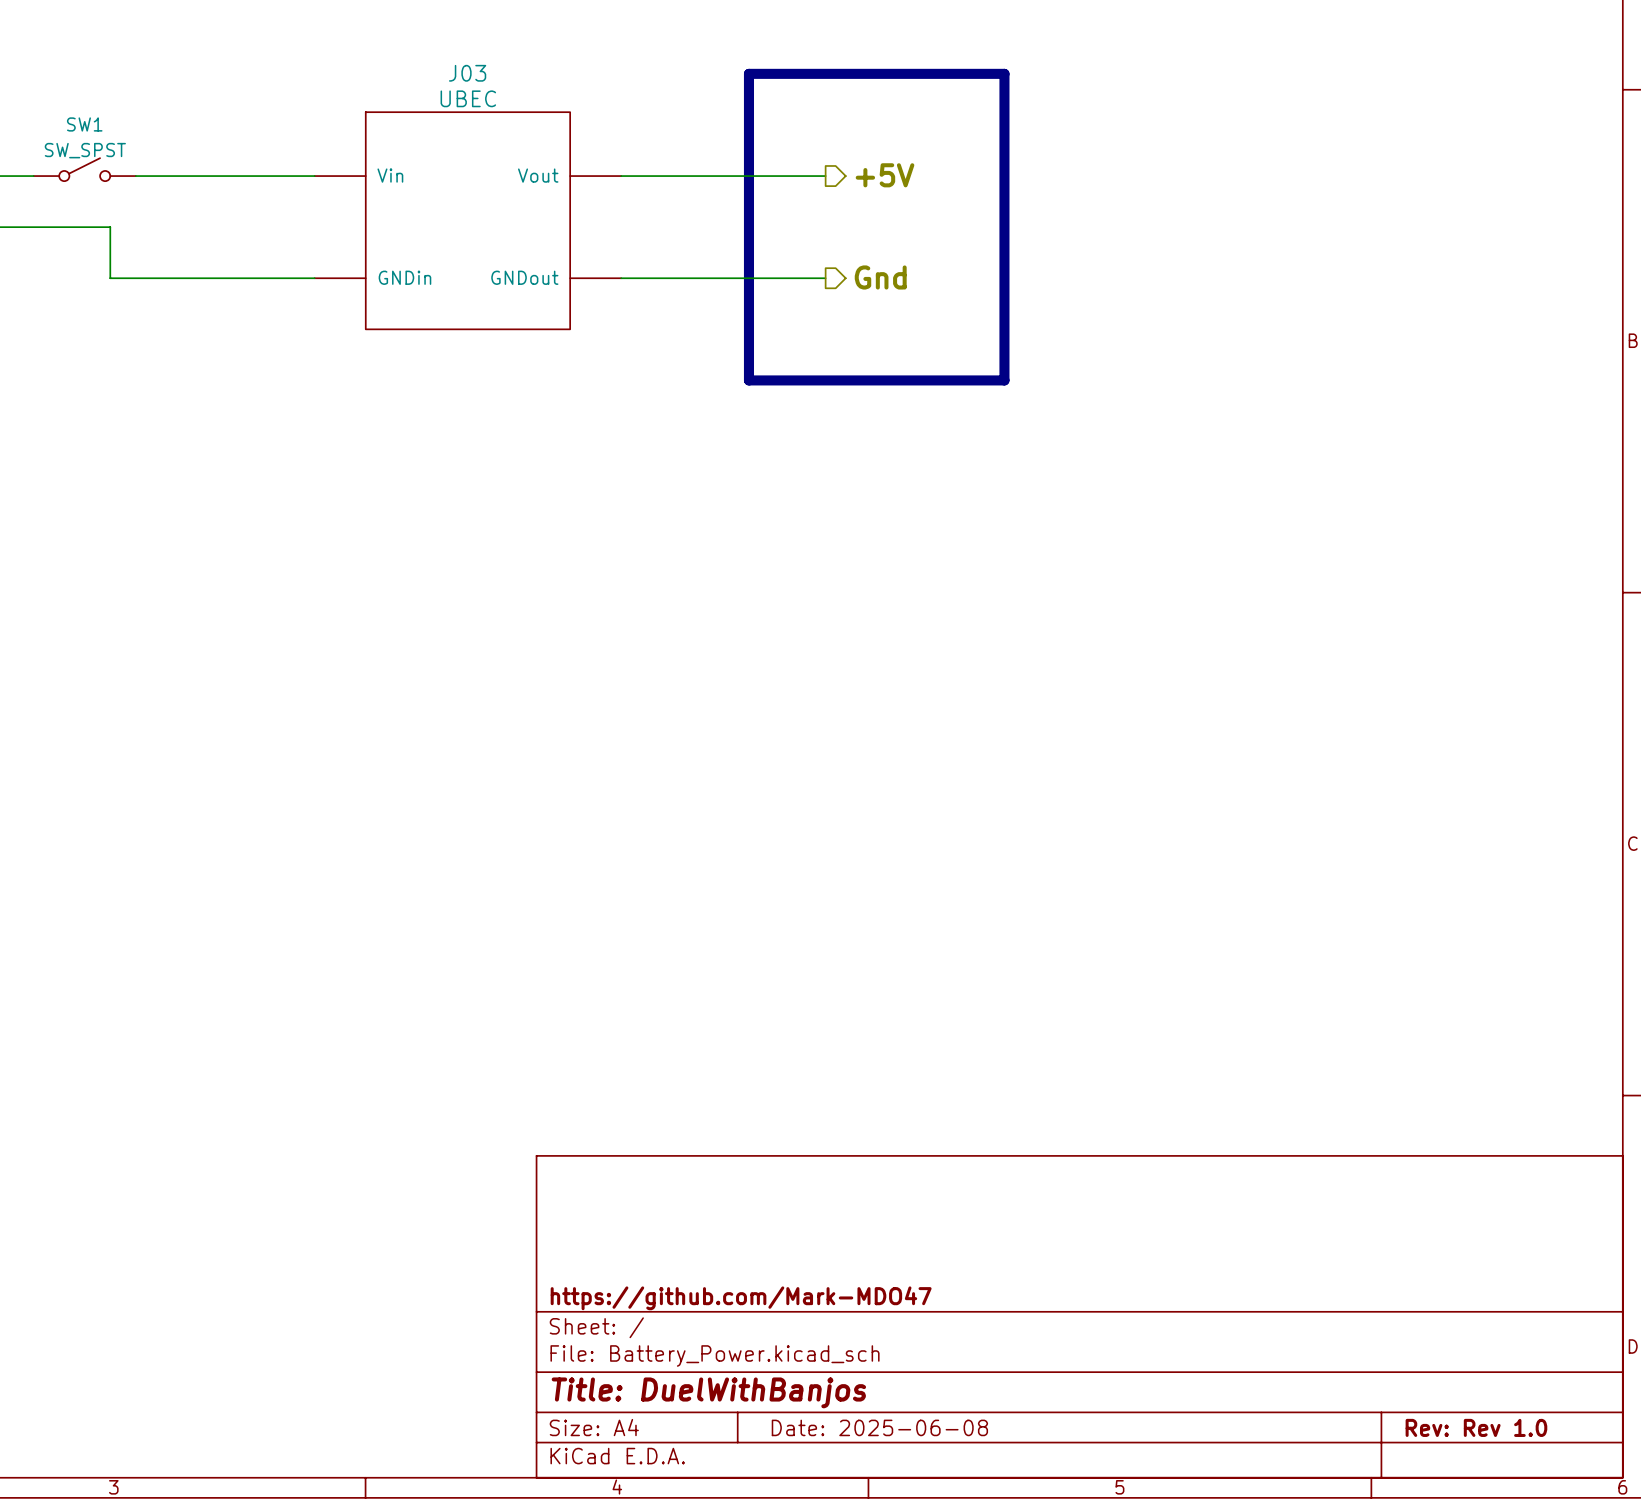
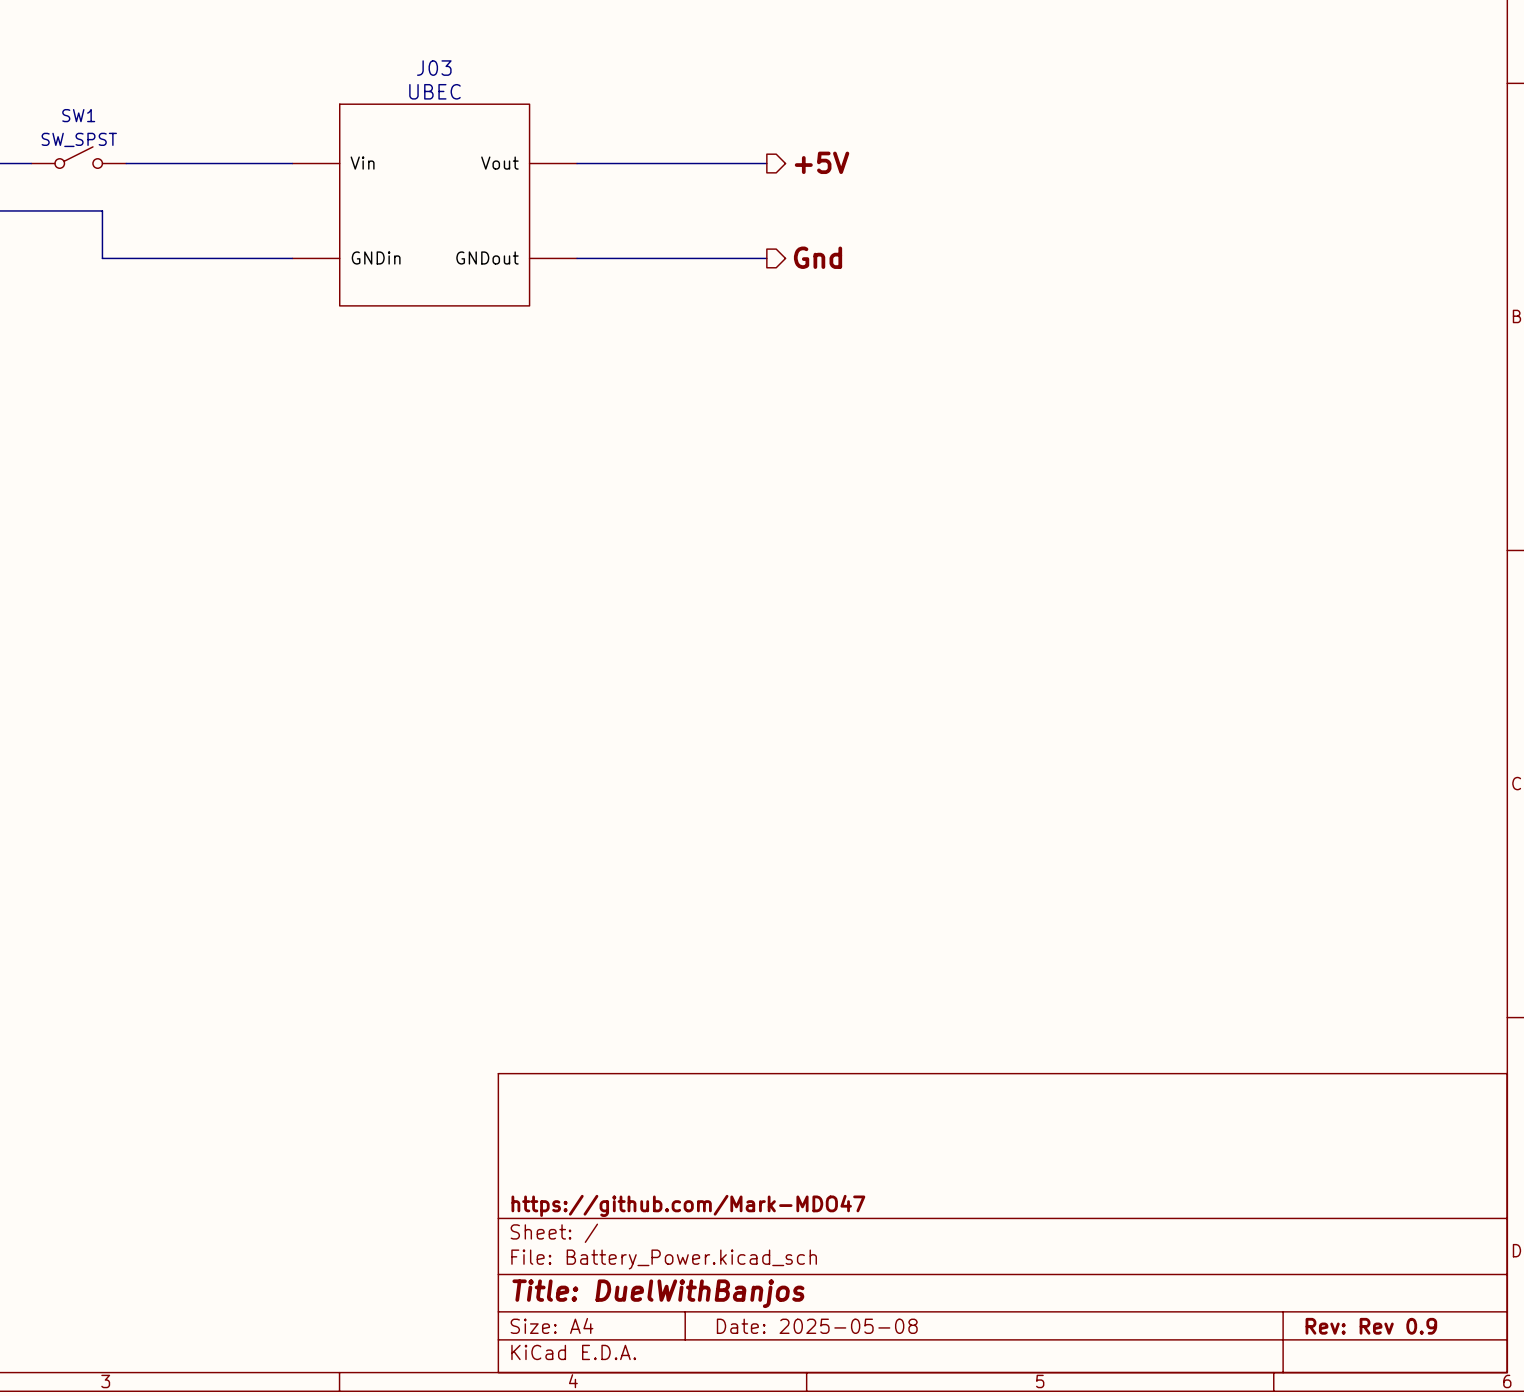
line: (748, 73) (1004, 73) (1004, 380) (748, 380) (748, 73) -> none
title block: Date: 2025-06-08 (879, 1427) -> Date: 2025-05-08 (817, 1326)
title block: Rev: Rev 1.0 (1476, 1427) -> Rev: Rev 0.9 (1371, 1326)

